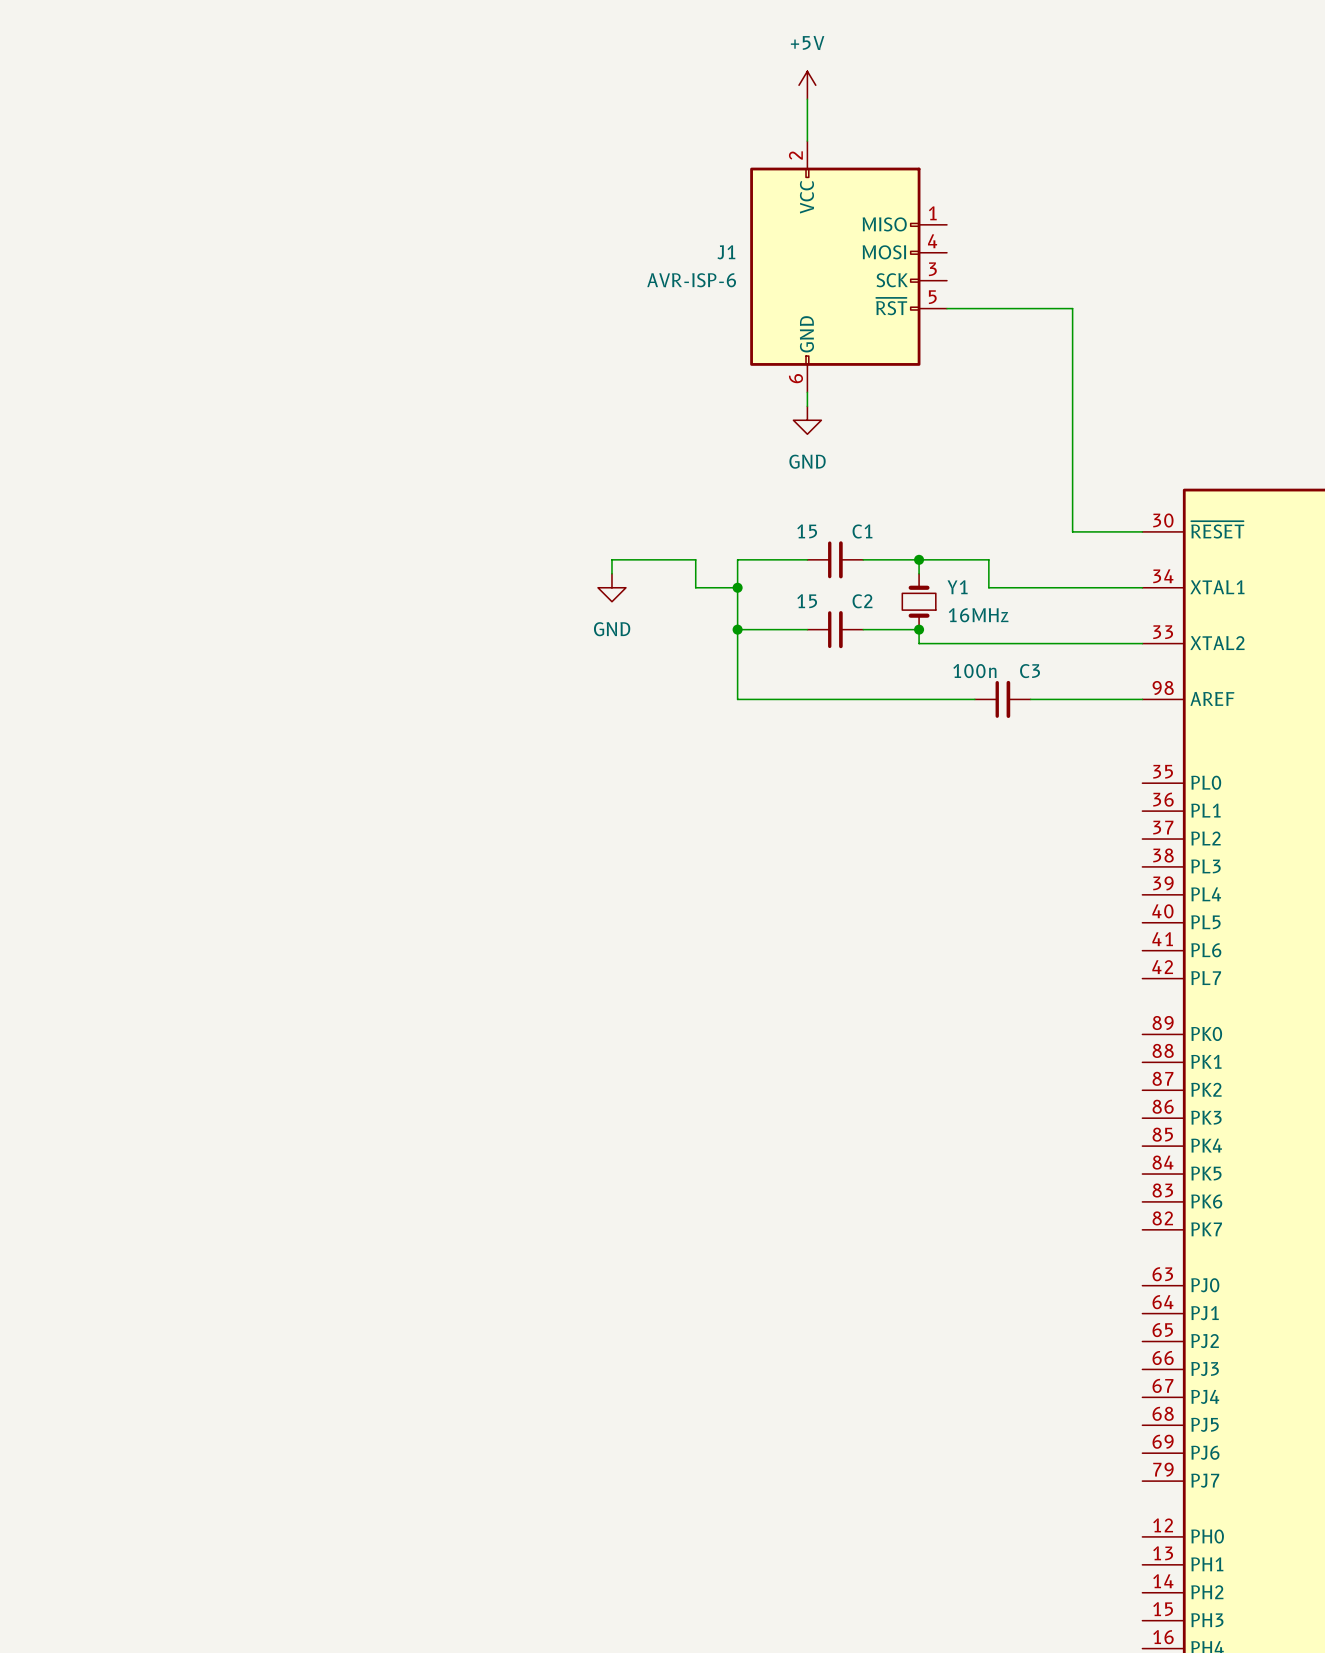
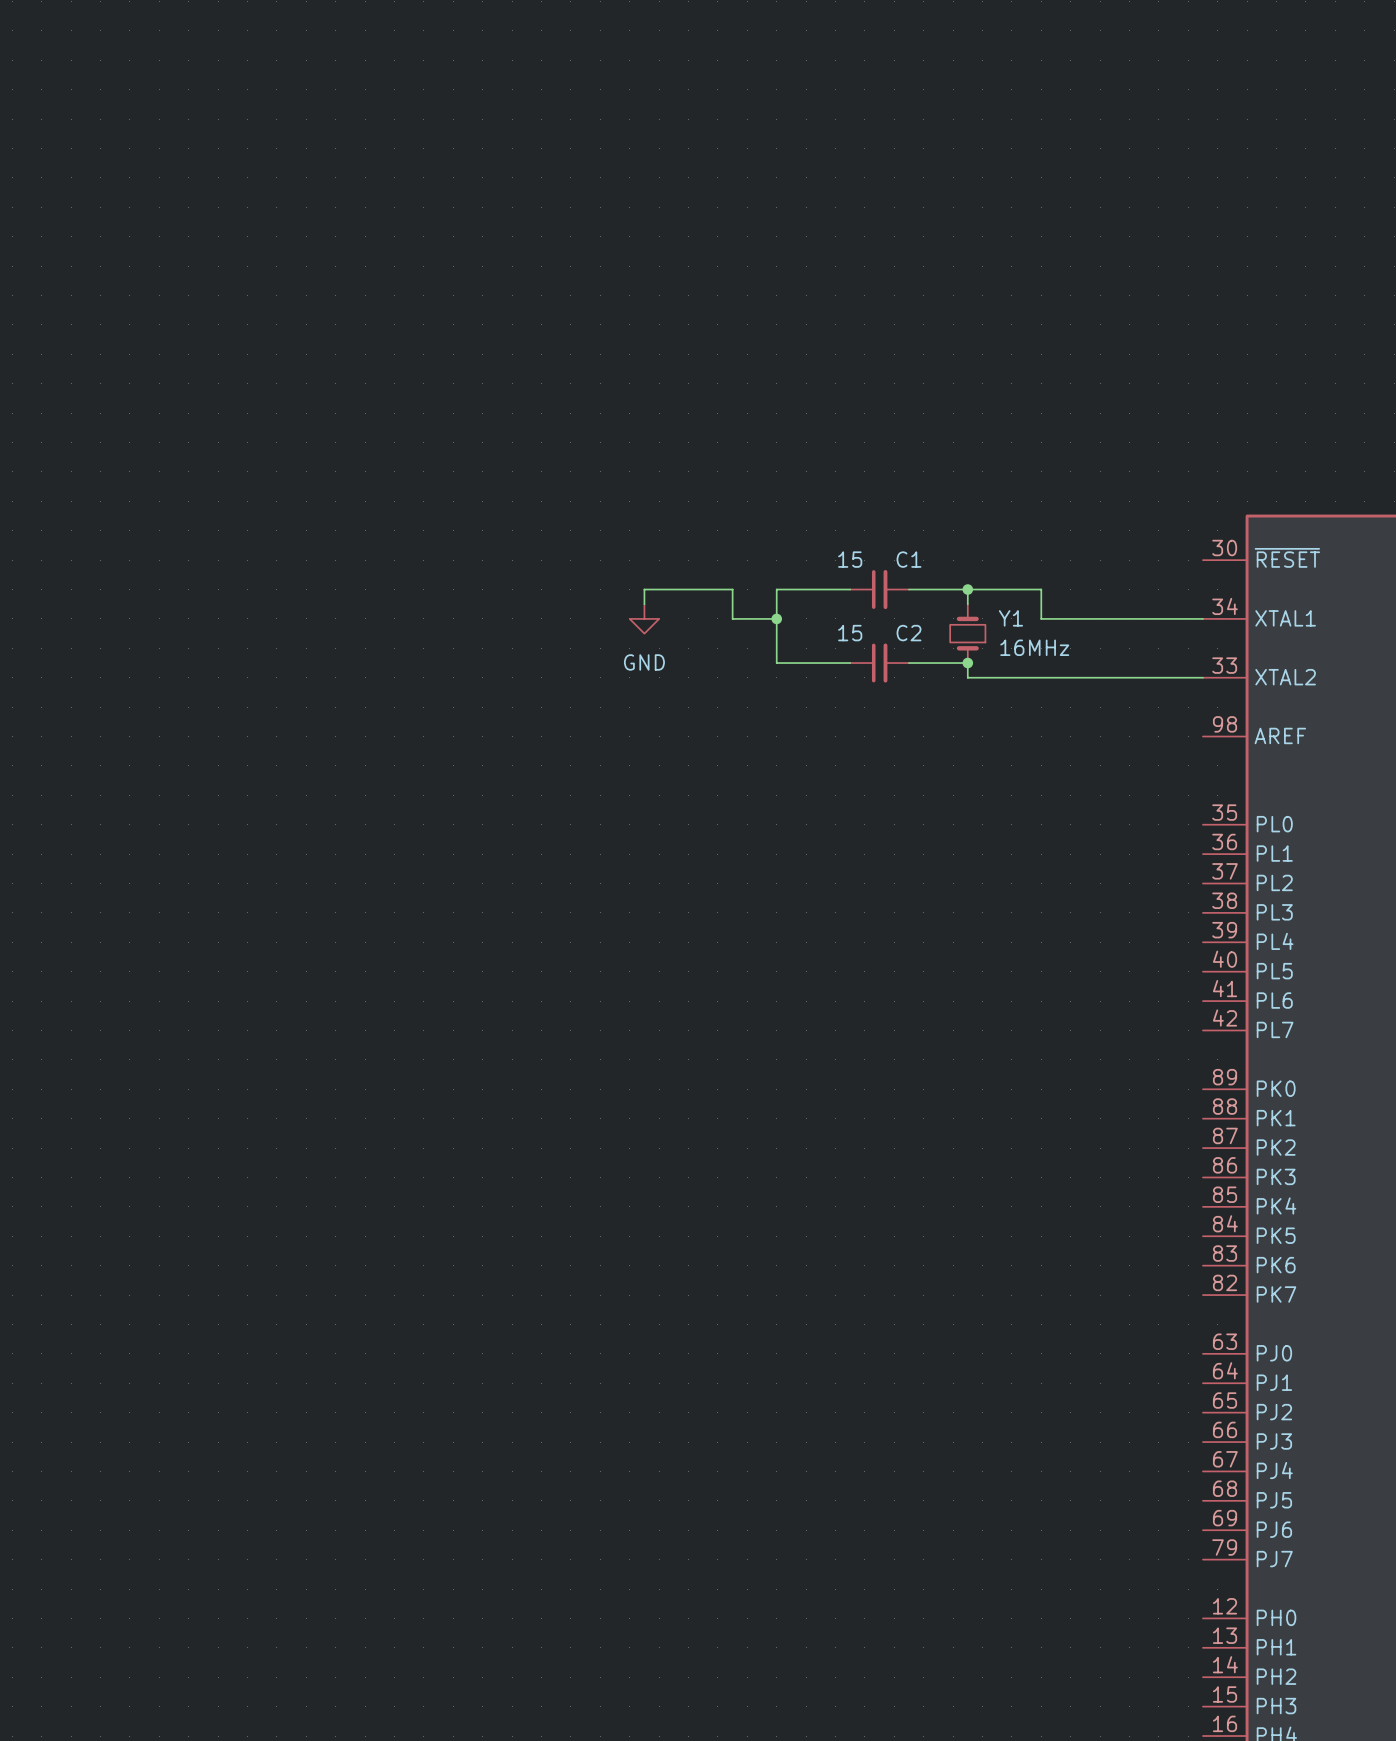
power symbol: +5V (807, 85) -> none
wire: (807, 99) (807, 141) -> none
J1: AVR-ISP-6 (848, 266) -> none
wire: (946, 308) (1072, 308) (1072, 531) (1142, 531) -> none
wire: (807, 392) (807, 406) -> none
power symbol: GND (807, 420) -> none
wire: (737, 629) (737, 699) (974, 699) -> none
junction: (737, 629) -> none
C3: 100n (1002, 699) -> none
wire: (1030, 699) (1142, 699) -> none

